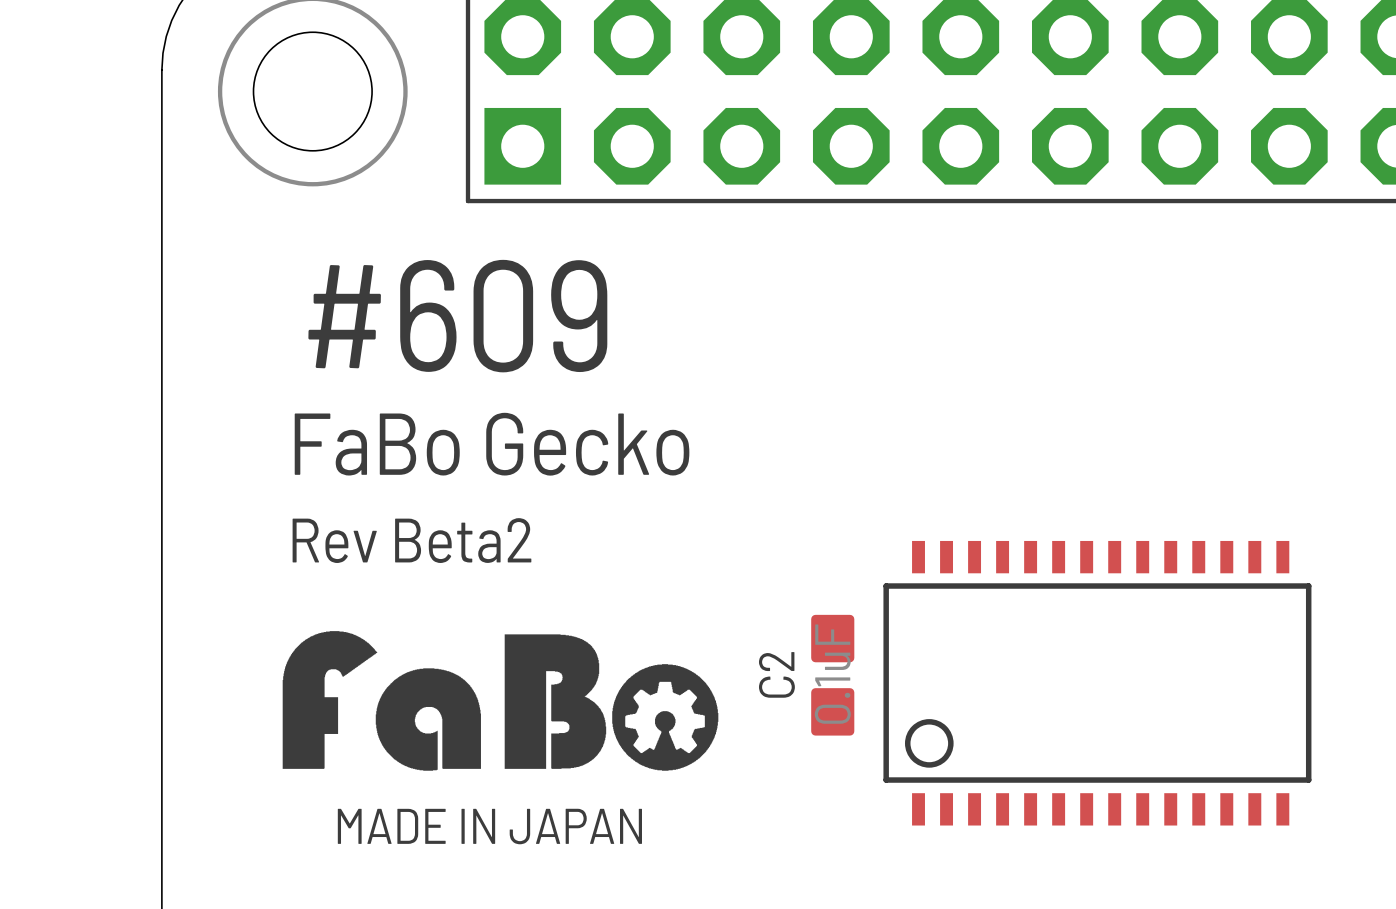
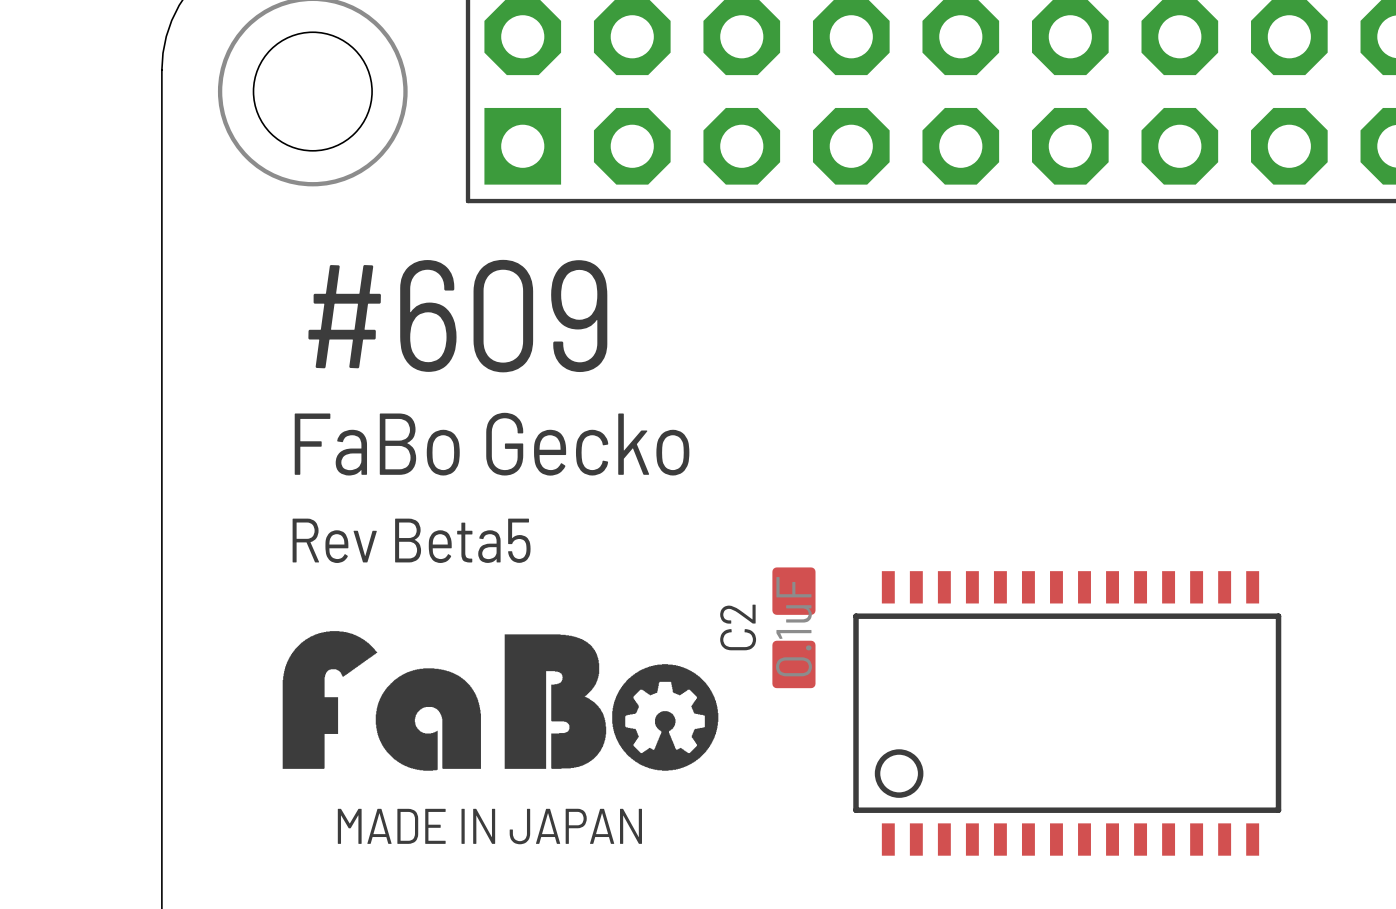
text: Rev Beta2 (411, 540) -> Rev Beta5 (411, 540)
C2 position: (832, 675) -> (793, 627)
part position: (1097, 683) -> (1067, 713)

